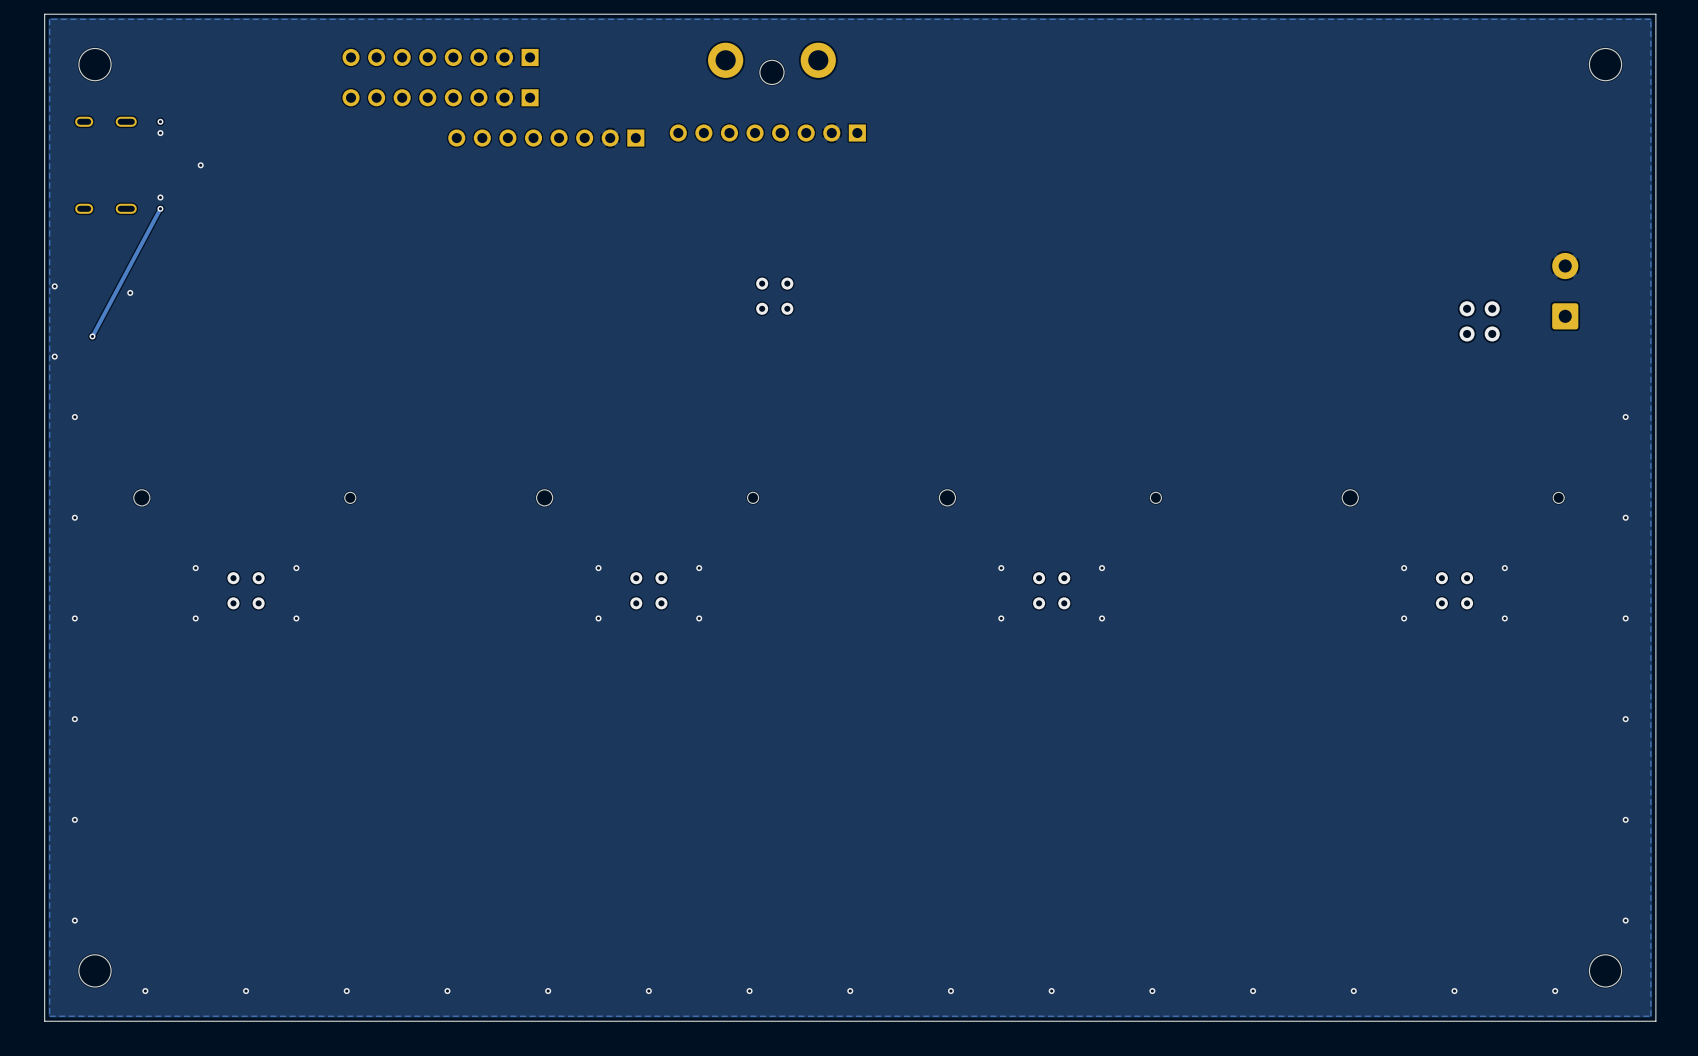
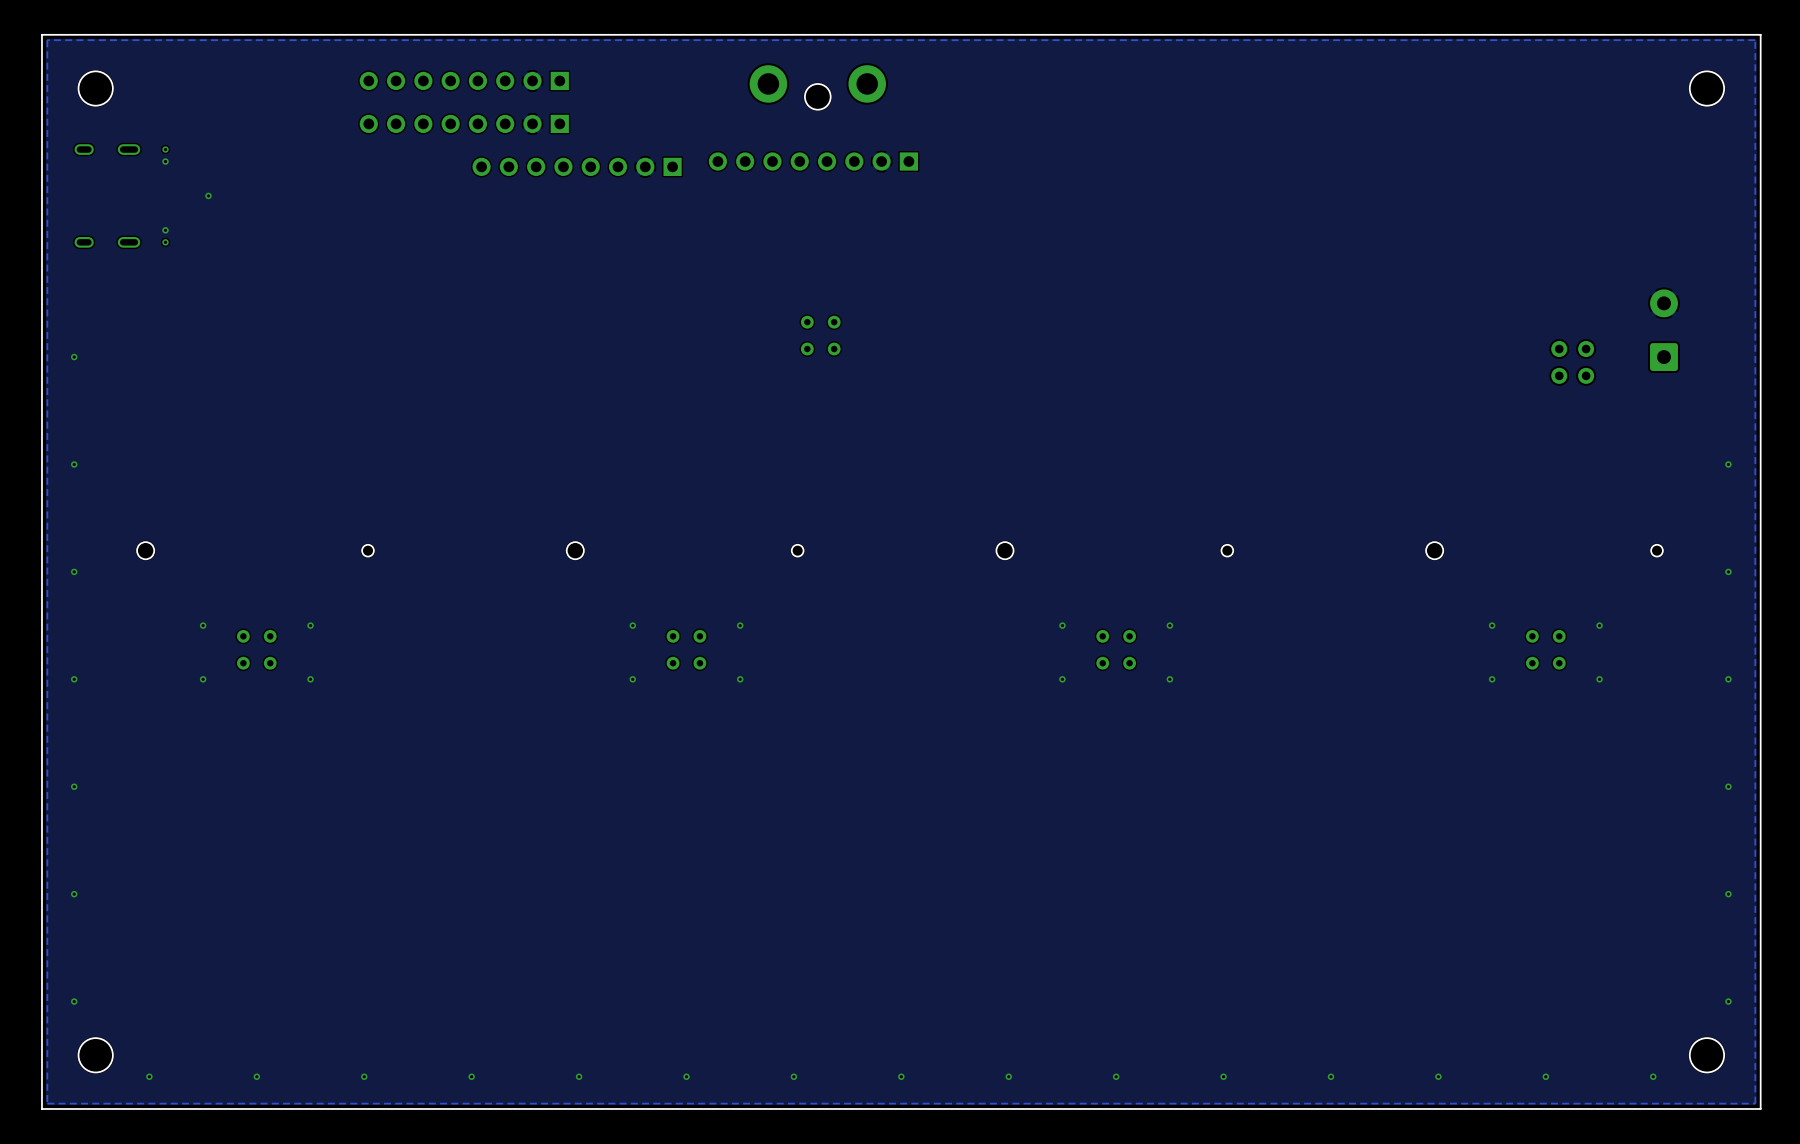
track: (160, 208) (92, 336) -> none
via: (54, 286) -> none
via: (130, 292) -> none
via: none -> (74, 357)
via: (92, 336) -> none
via: (54, 356) -> none

